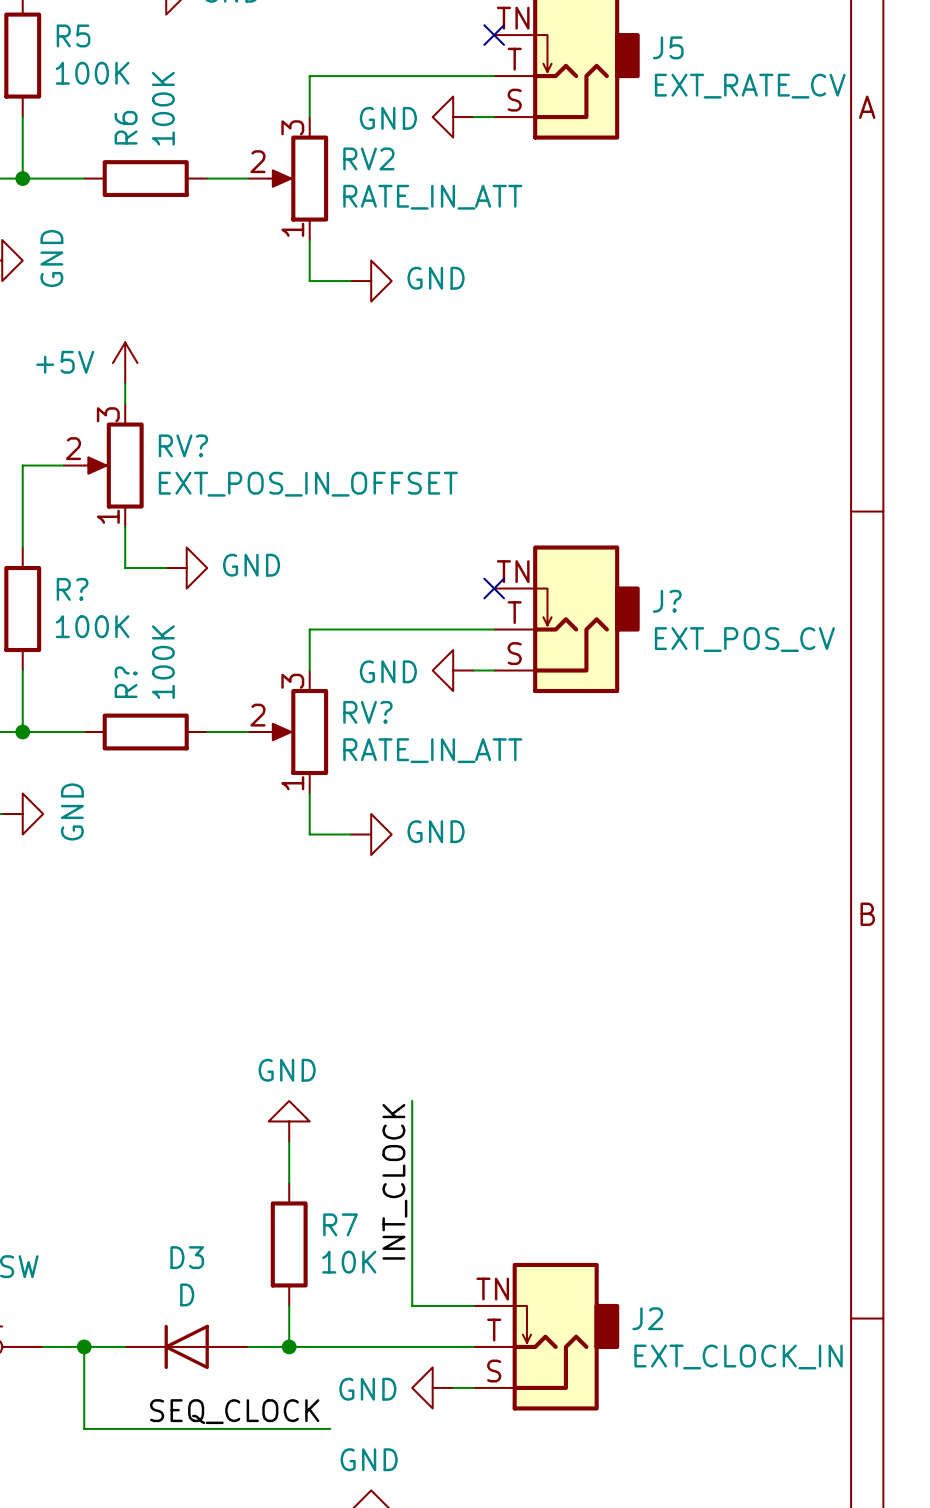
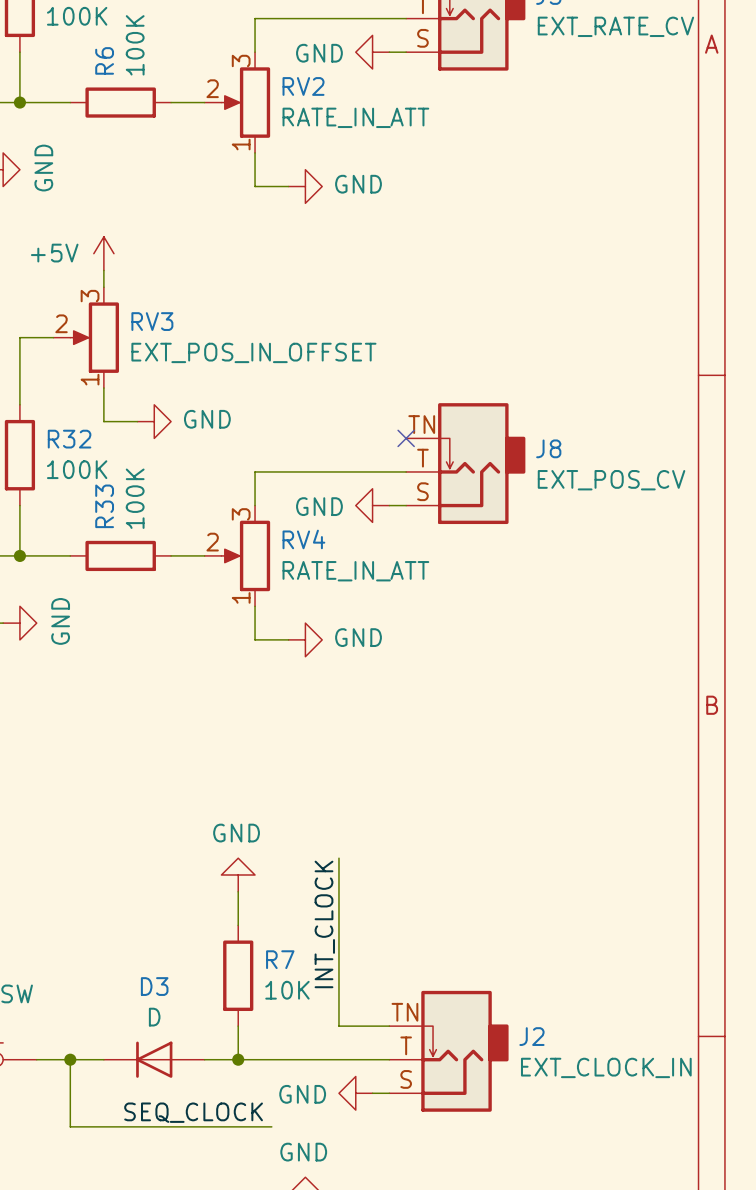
RV? name: RV? (183, 445) -> RV3 (152, 321)
R? name: R? (72, 589) -> R32 (69, 439)
J? name: J? (667, 601) -> J8 (548, 448)
R? name: R? (126, 682) -> R33 (104, 506)
RV? name: RV? (367, 712) -> RV4 (303, 539)

